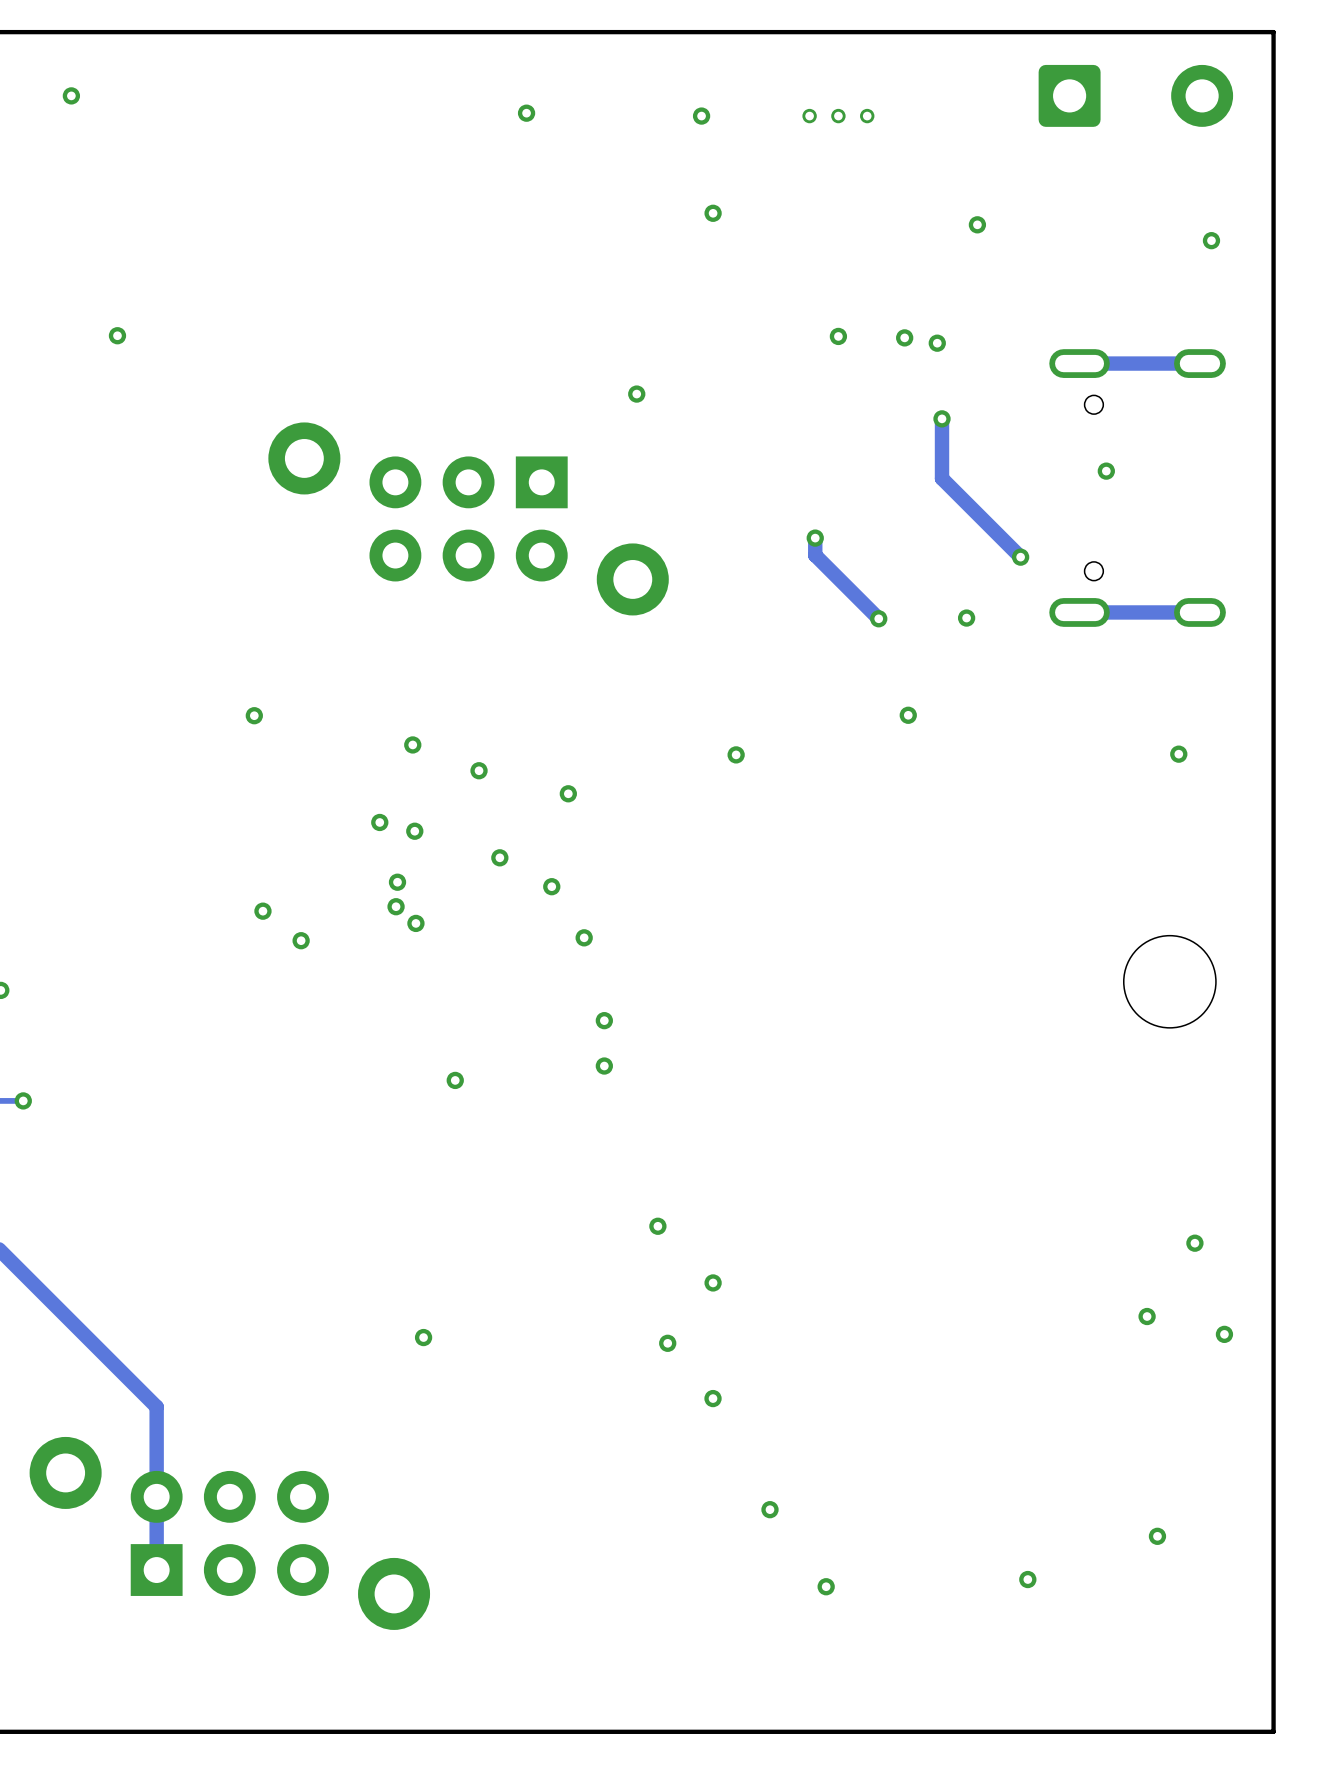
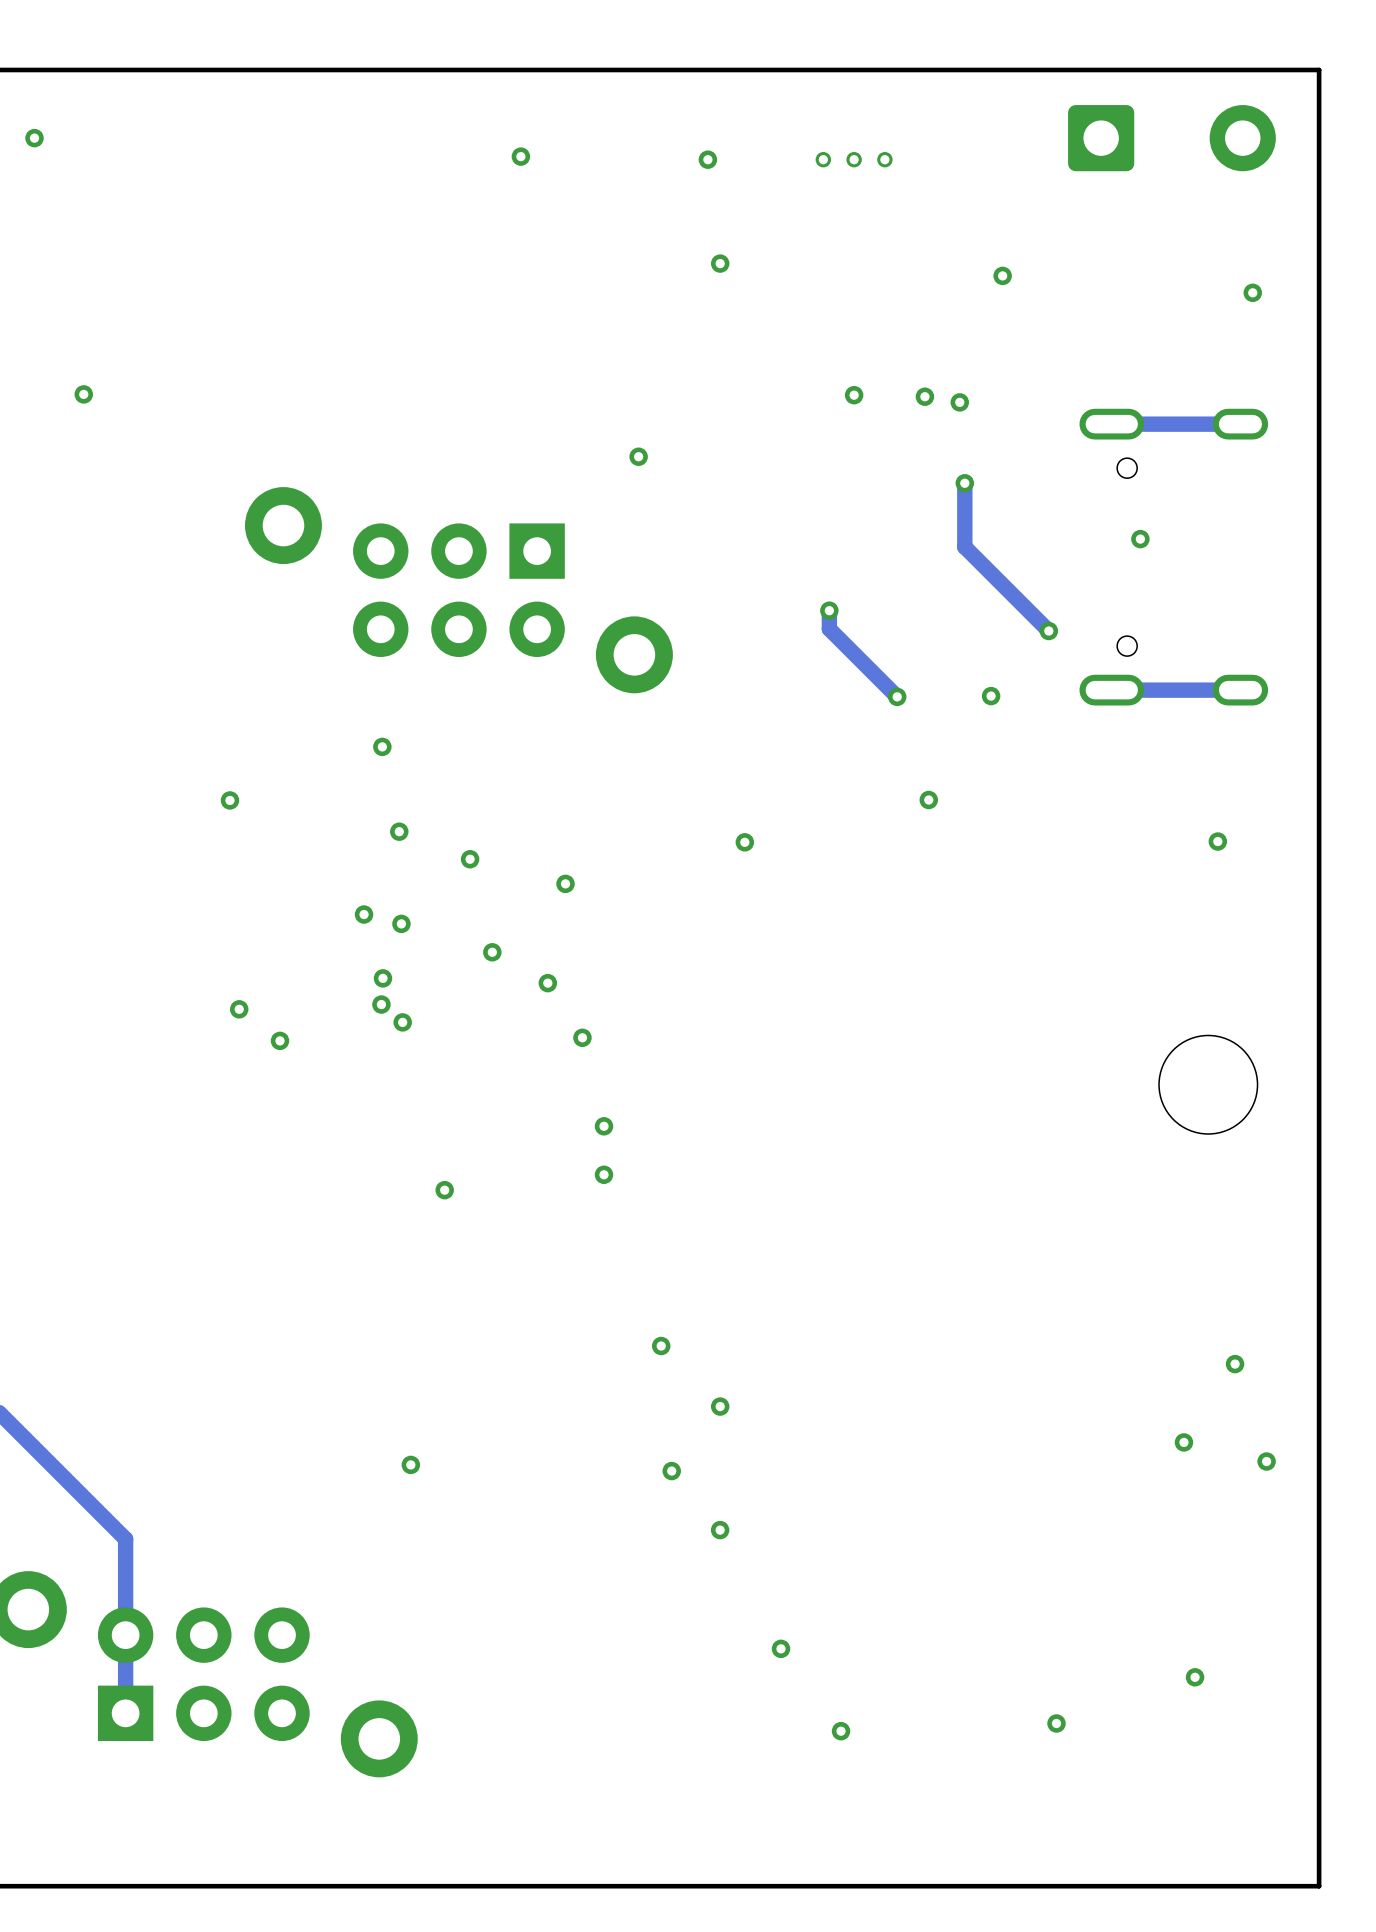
via: none -> (382, 746)

